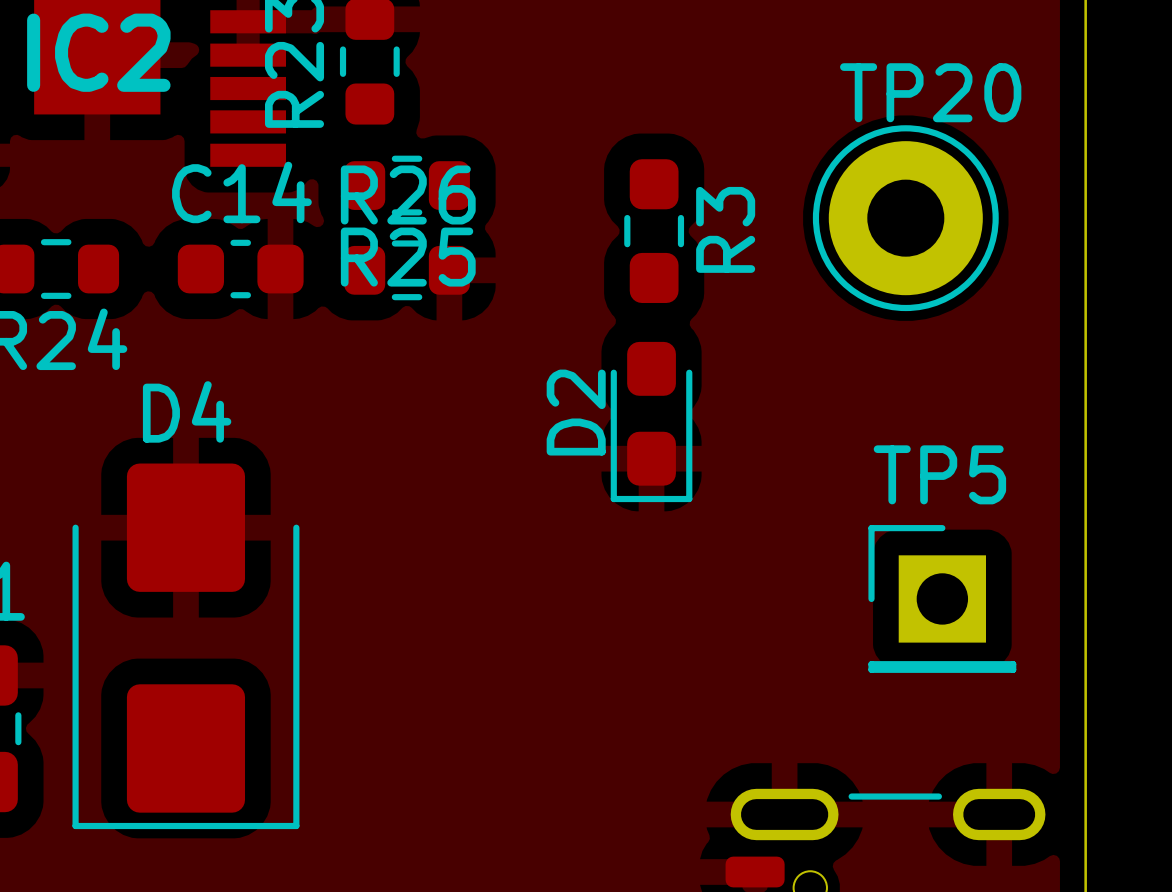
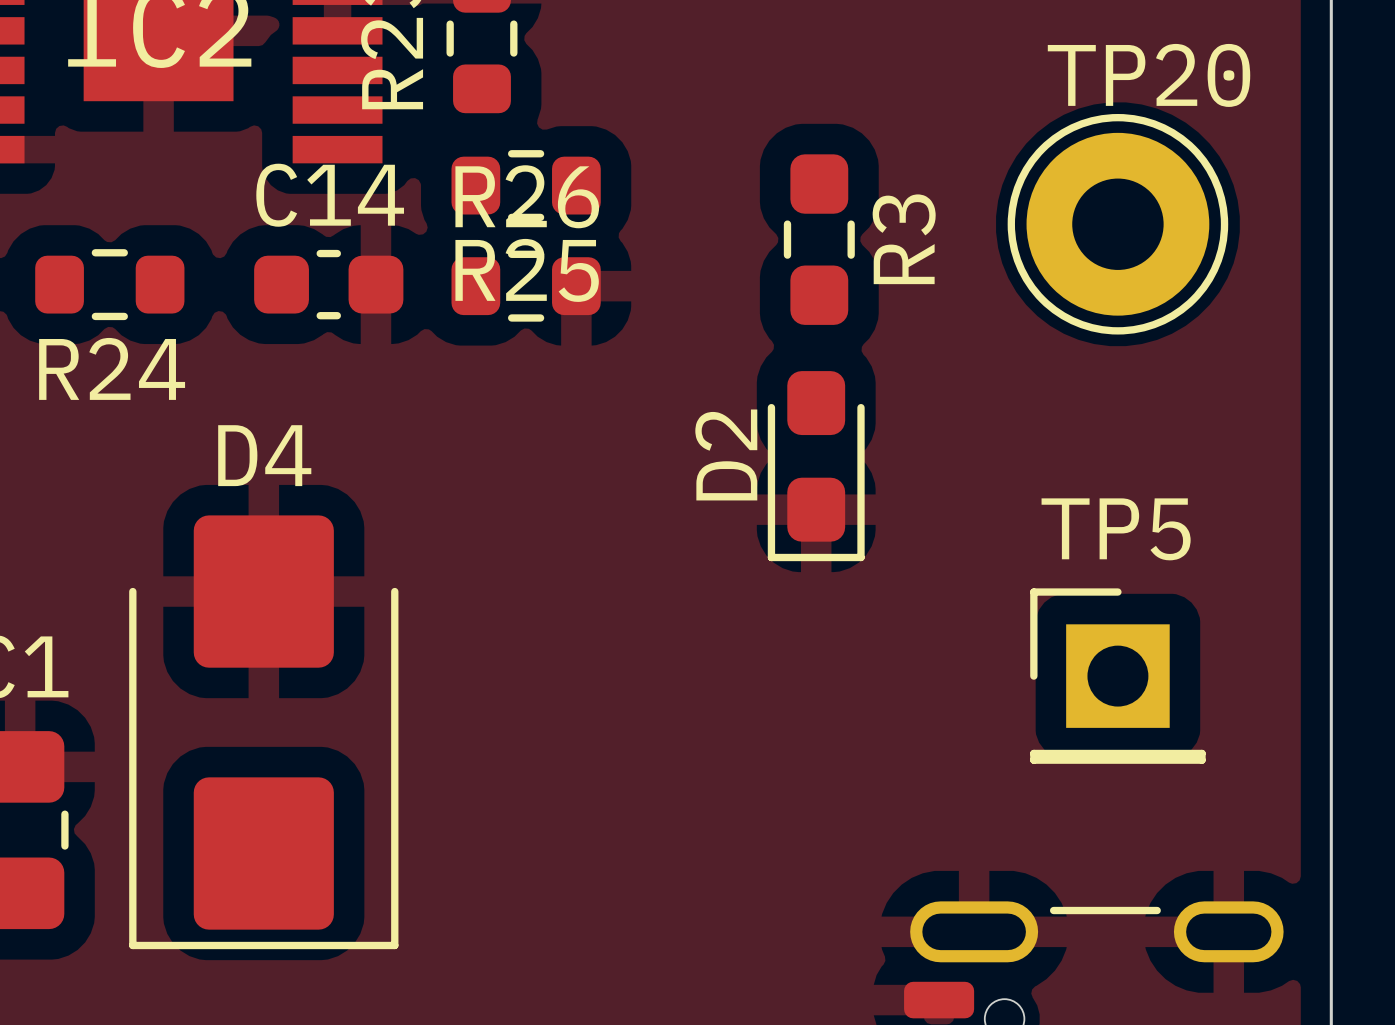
TP5 position: (942, 598) -> (1117, 676)

